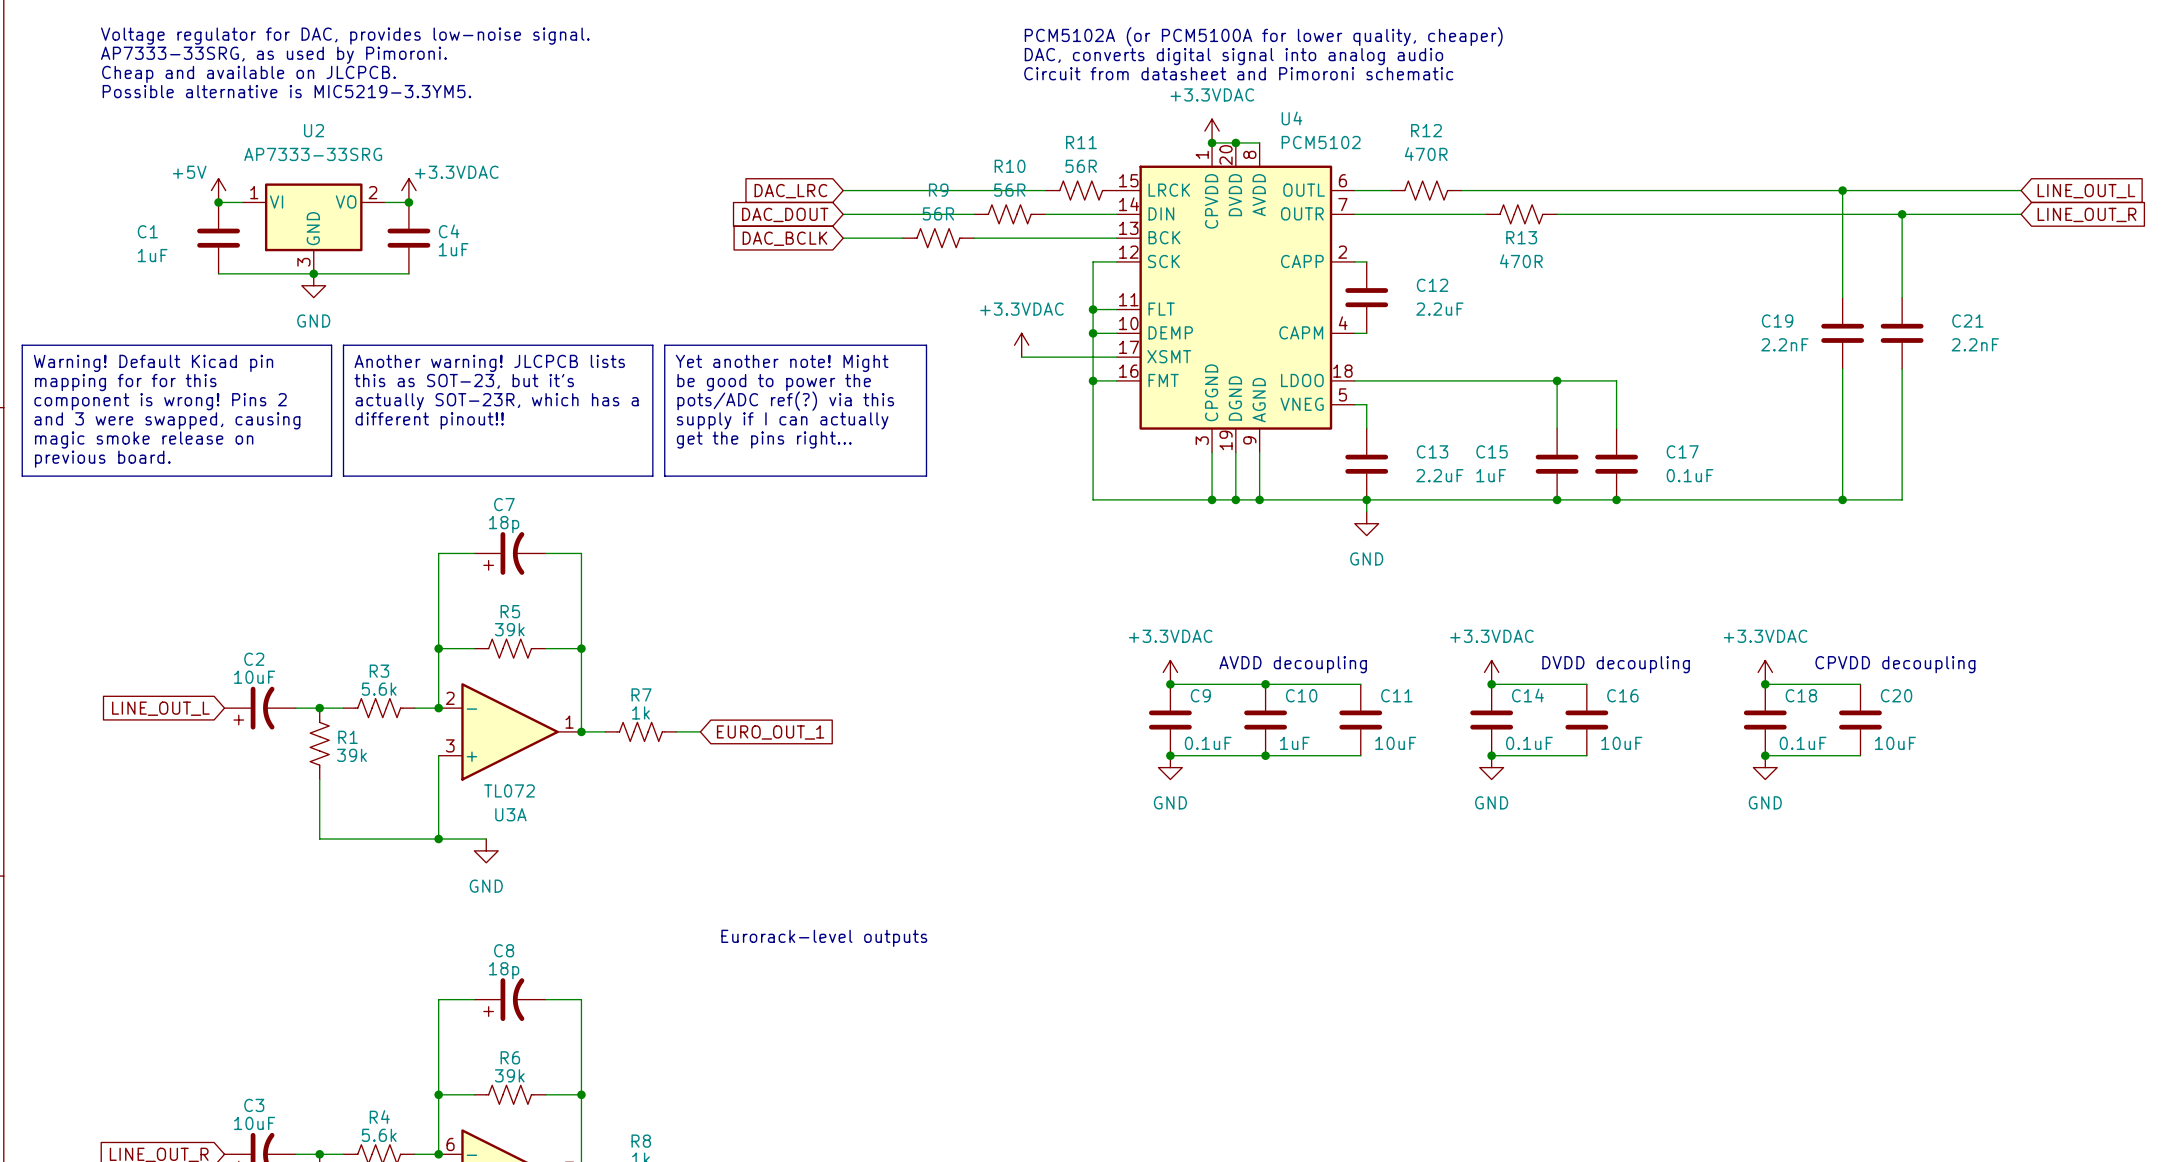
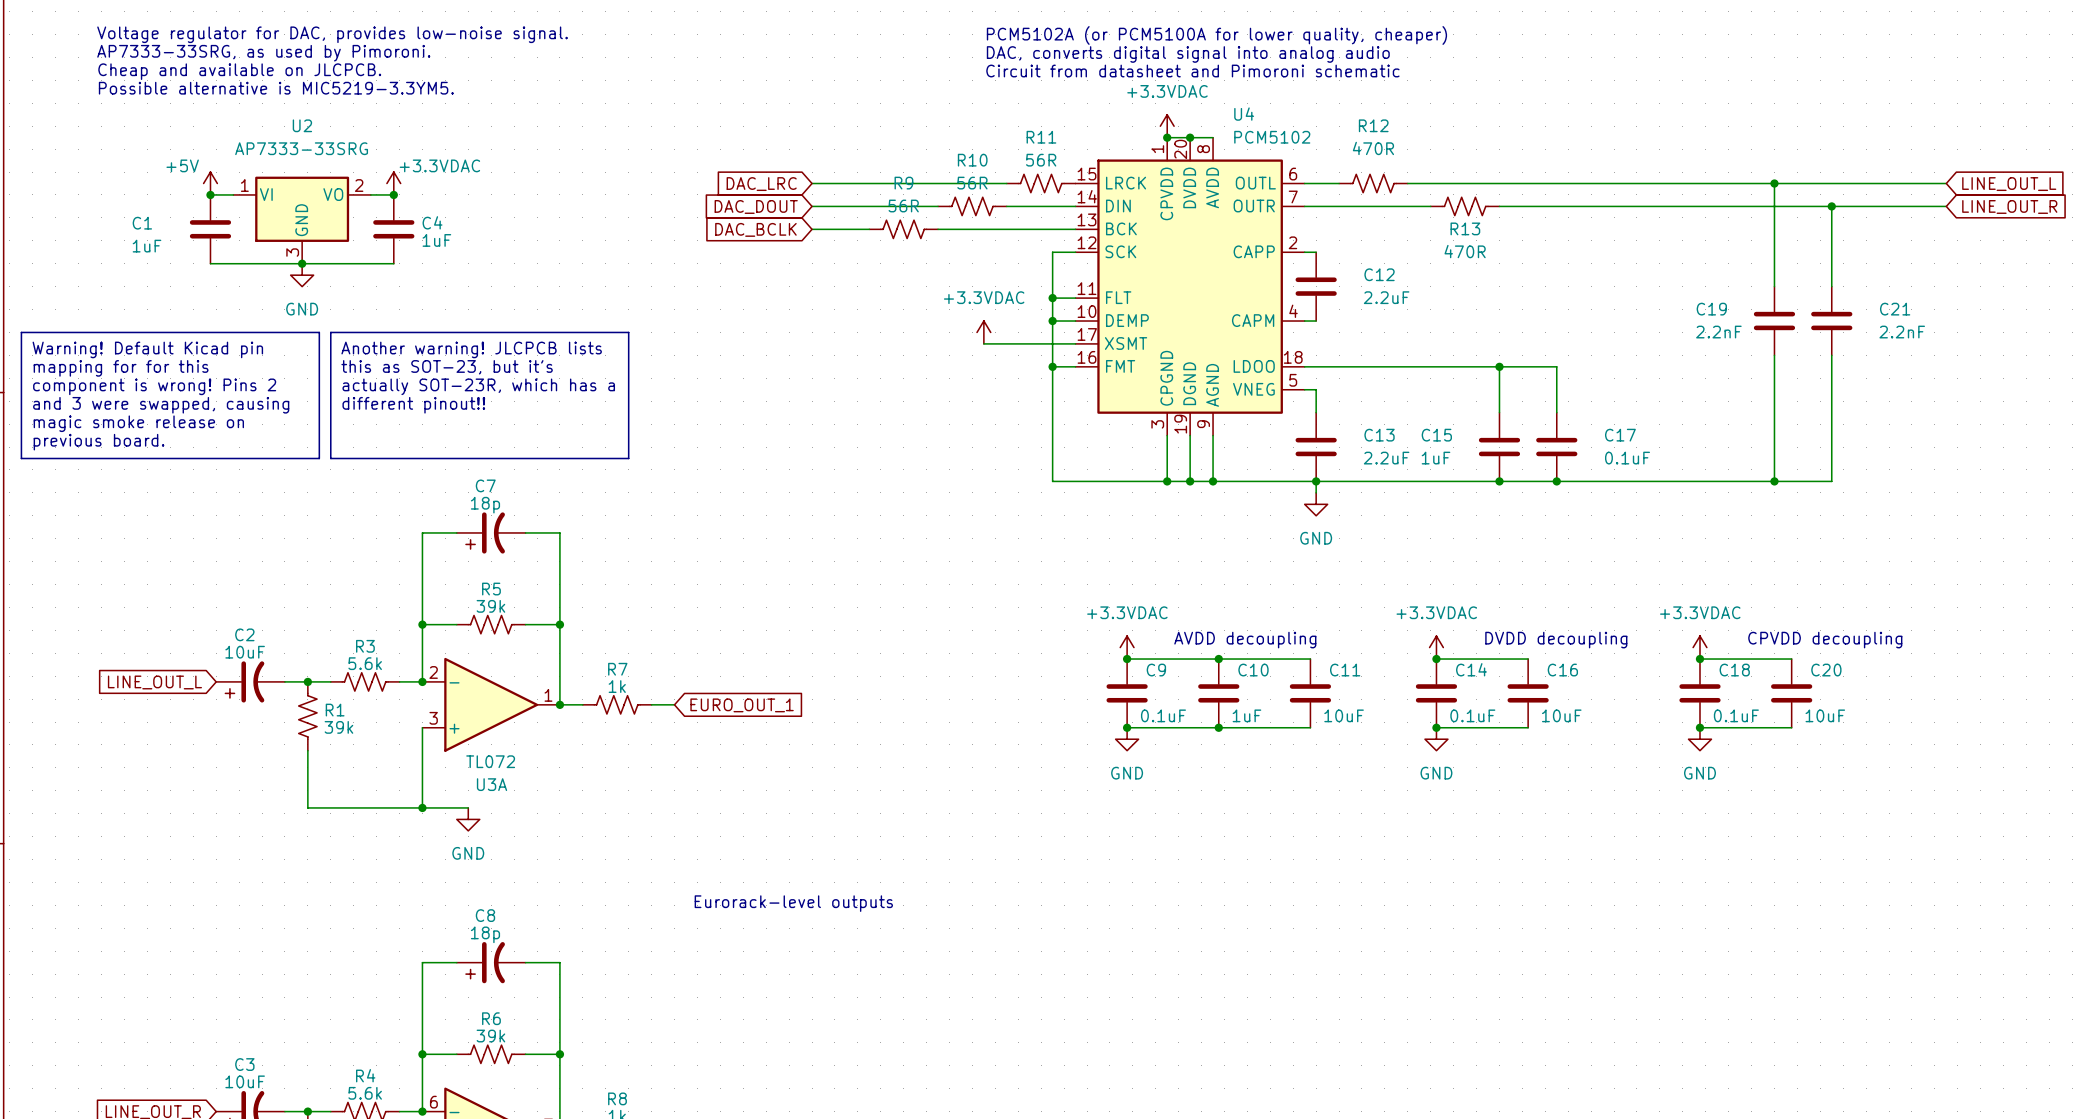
line: (664, 345) (926, 345) (926, 476) (664, 476) (664, 345) -> none
text: Yet another note! Might (782, 363) -> none
text: be good to power the (774, 382) -> none
text: pots/ADC ref(?) via this (785, 401) -> none
text: supply if I can actually (782, 420) -> none
text: get the pins right... (764, 439) -> none

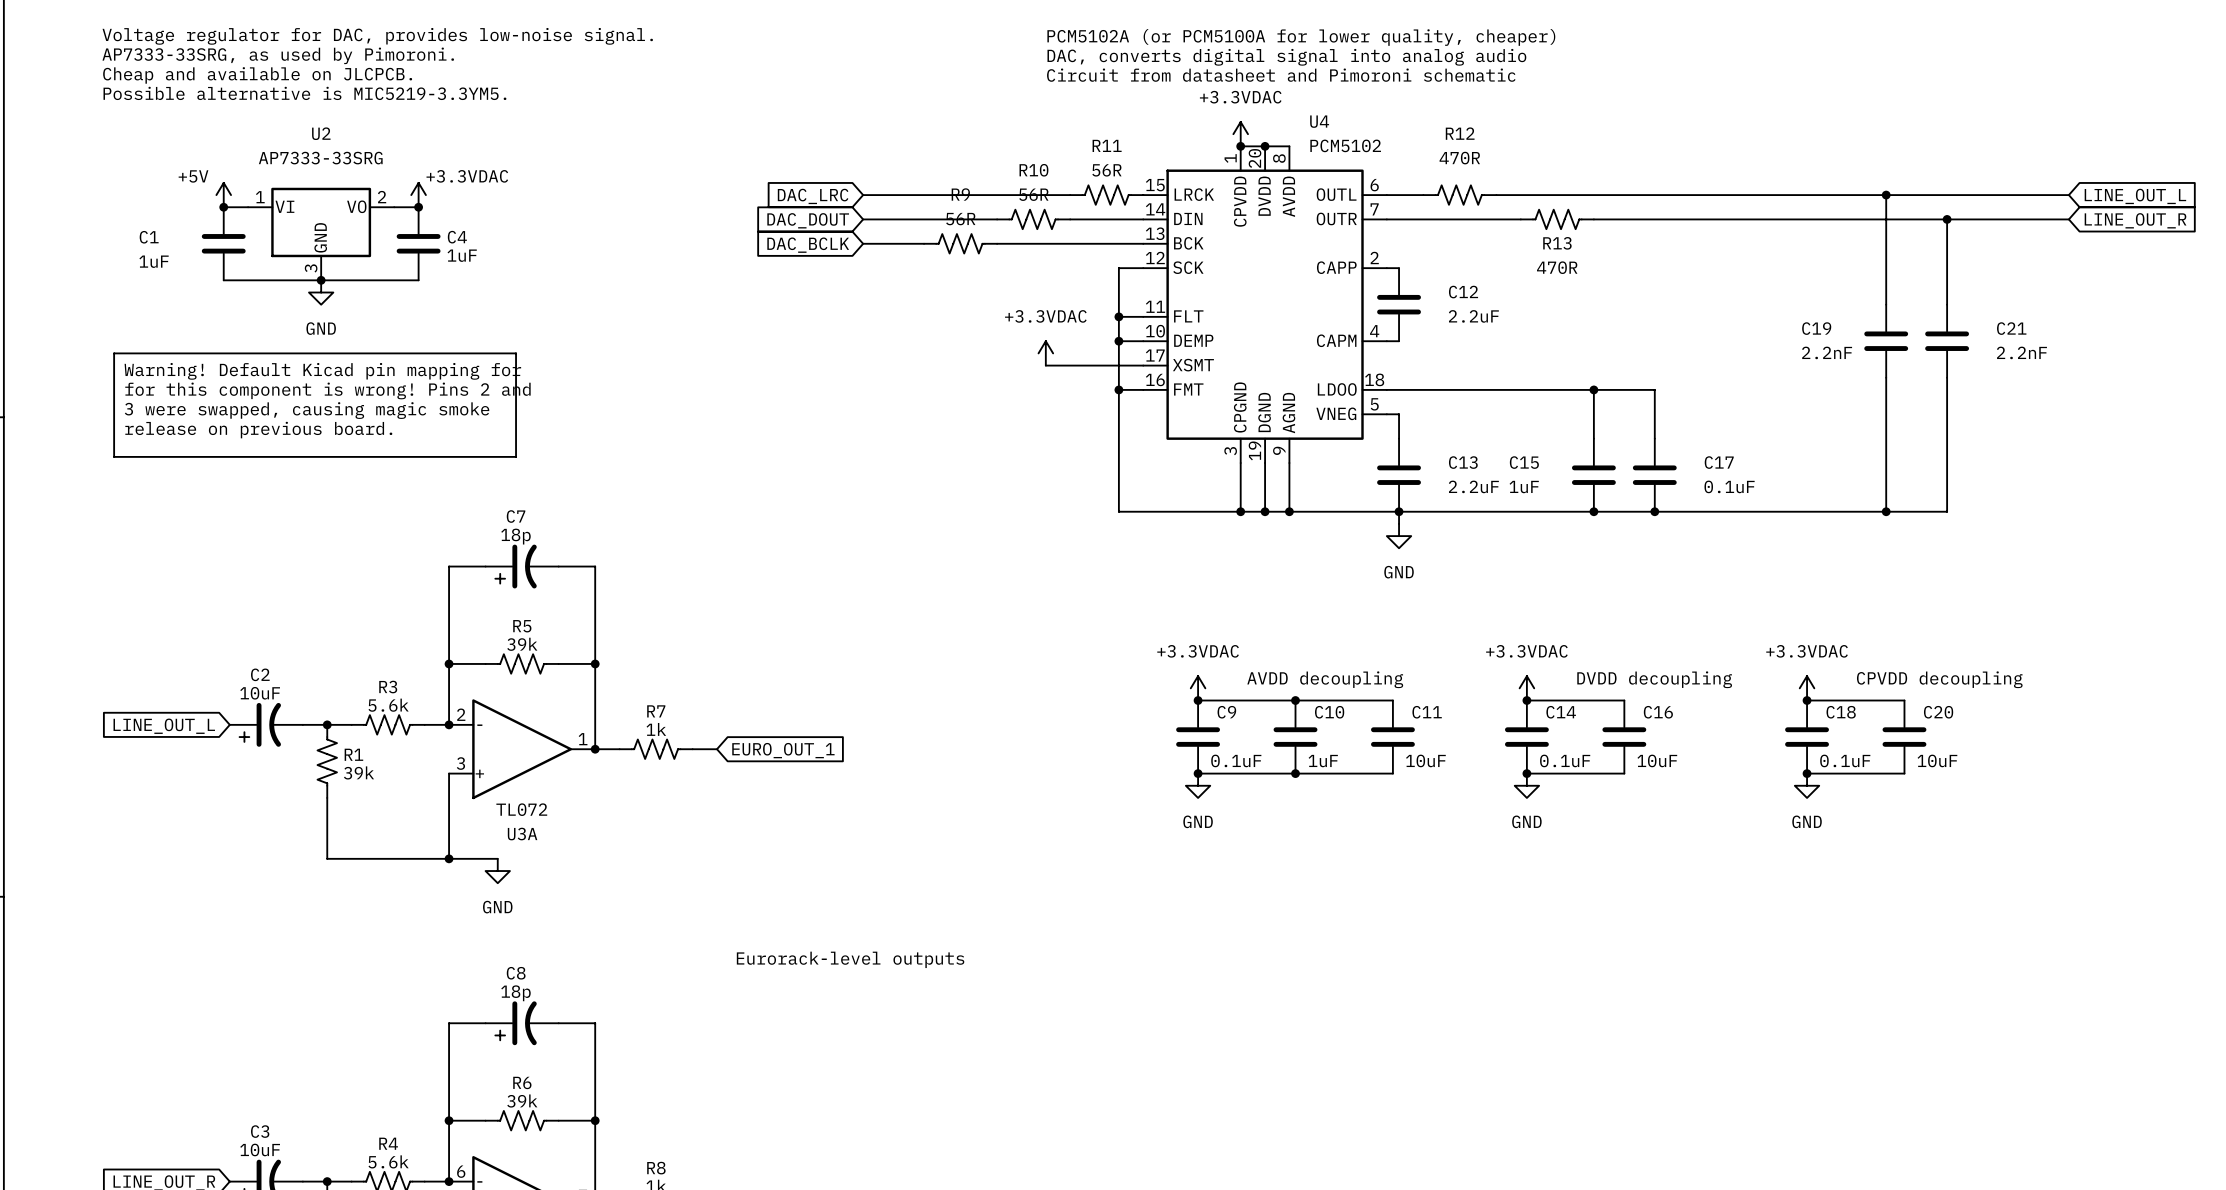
line: (107, 332) (21, 332) (21, 458) (319, 458) (319, 332) -> (114, 353) (114, 456) (516, 456) (516, 353)
line: (330, 332) (330, 458) (628, 458) (628, 332) (485, 332) -> (351, 353) (339, 353)
text: Warning! Default Kicad pin (147, 349) -> Warning! Default Kicad pin mapping for (322, 371)
text: Another warning! JLCPCB lists (471, 349) -> none
text: this as SOT-23, but it's (447, 367) -> none
text: mapping for for this (121, 368) -> none
text: component is wrong! Pins 2 (154, 386) -> for this component is wrong! Pins 2 and (327, 390)
text: actually SOT-23R, which has a (478, 386) -> none
text: and 3 were swapped, causing (161, 405) -> 3 were swapped, causing magic smoke (307, 410)
text: none -> release on previous board. (258, 430)
text: different pinout!! (413, 405) -> none
text: magic smoke release on (138, 423) -> none
text: previous board. (98, 442) -> none

